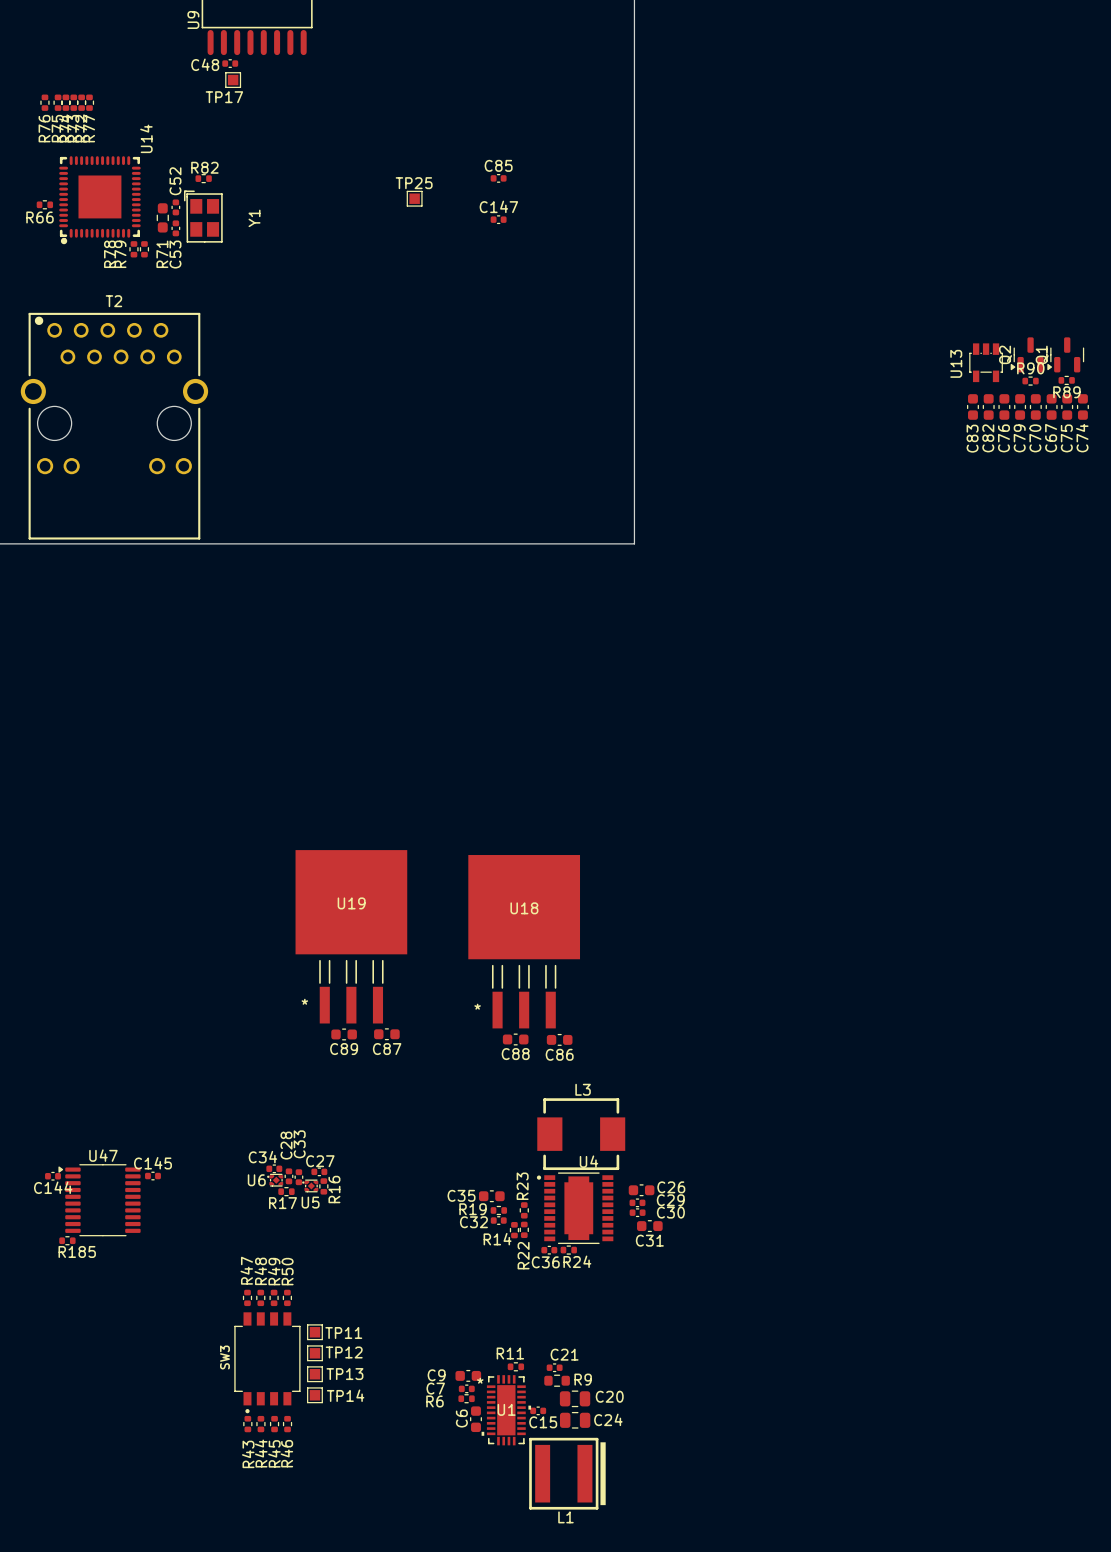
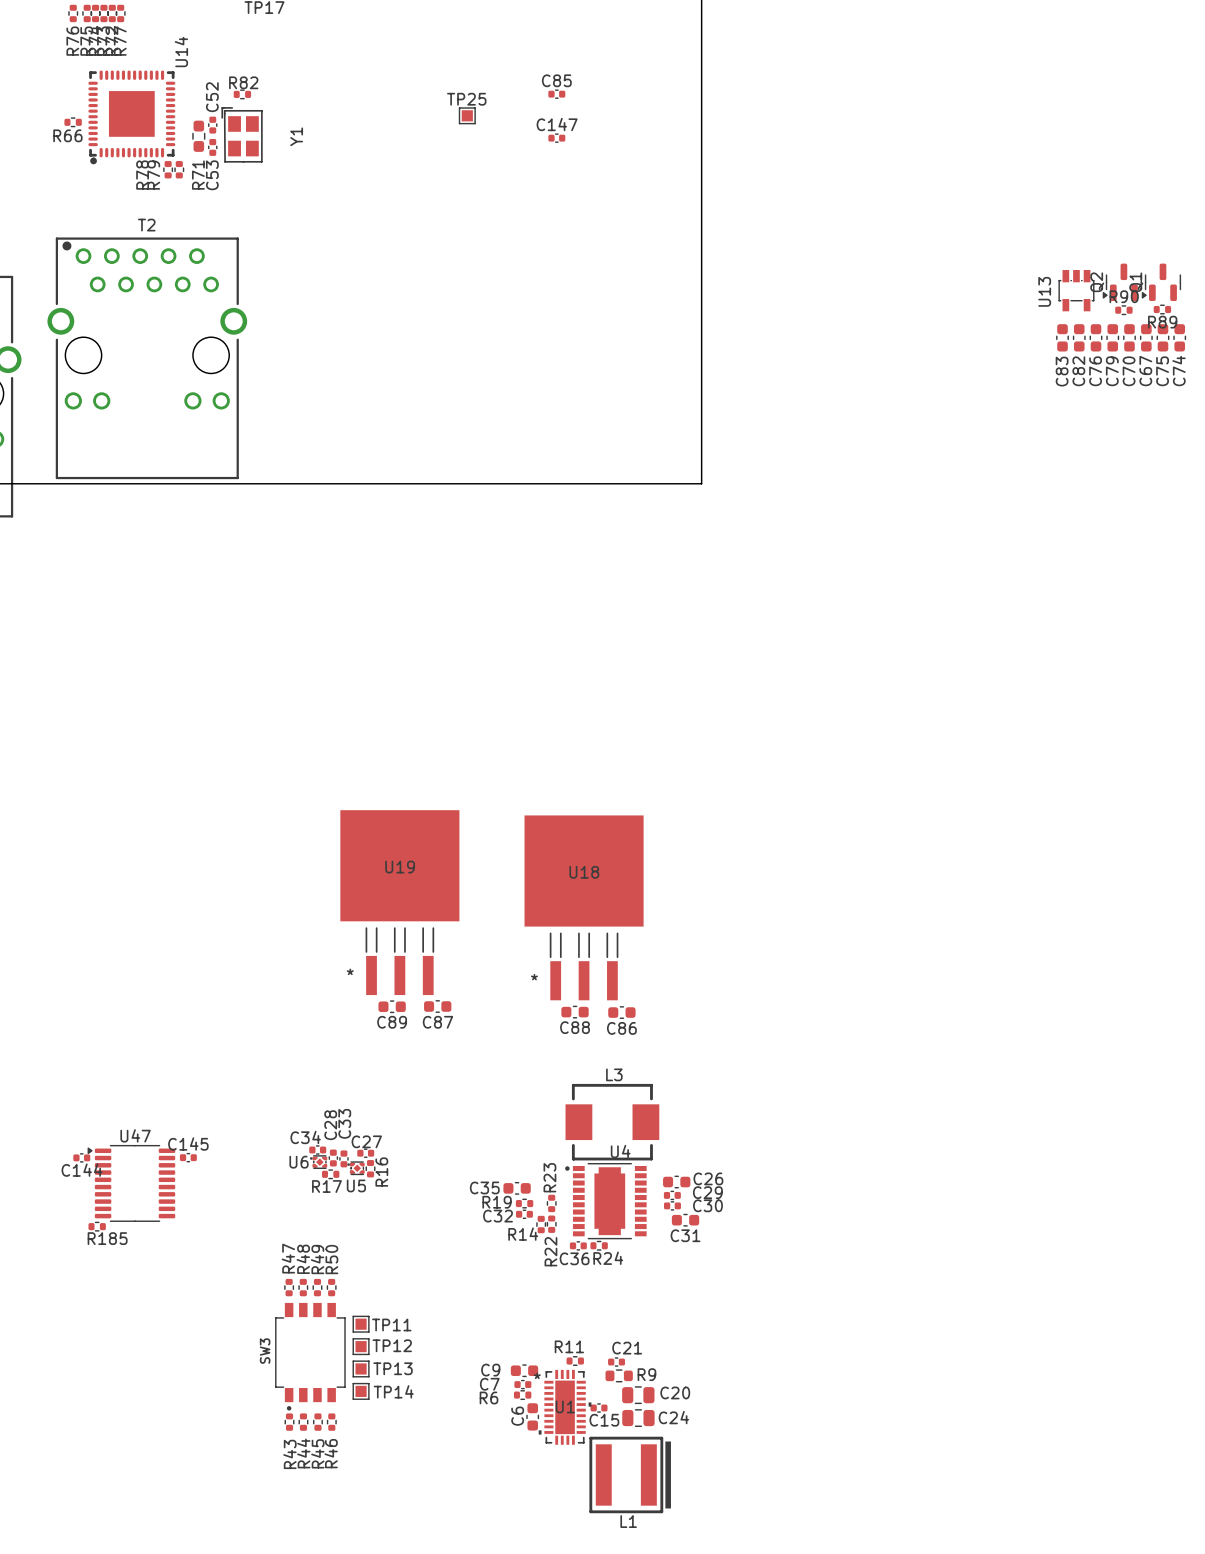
L3 position: (581, 1134) -> (612, 1122)
C26 position: (641, 1190) -> (676, 1182)
C35 position: (491, 1196) -> (517, 1188)
C29 position: (637, 1202) -> (672, 1195)
U4 position: (575, 1208) -> (605, 1201)
R19 position: (498, 1210) -> (524, 1203)
R23 position: (524, 1210) -> (551, 1203)
C30 position: (637, 1212) -> (672, 1205)
C32 position: (498, 1220) -> (524, 1214)
C31 position: (649, 1226) -> (685, 1220)
R22 position: (524, 1229) -> (551, 1224)
R14 position: (514, 1230) -> (541, 1224)
C36 position: (549, 1250) -> (578, 1245)
R24 position: (568, 1250) -> (599, 1245)

